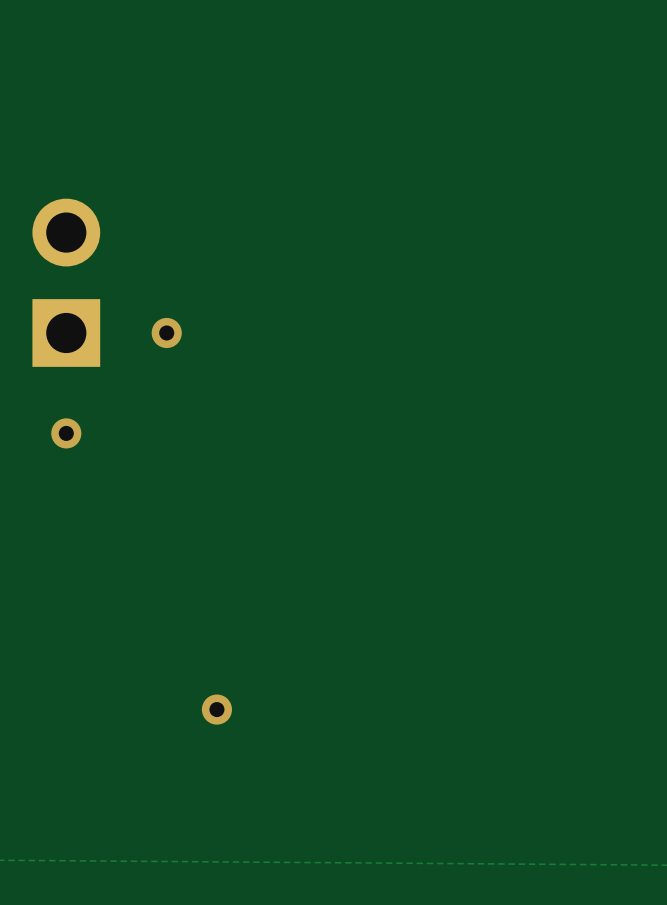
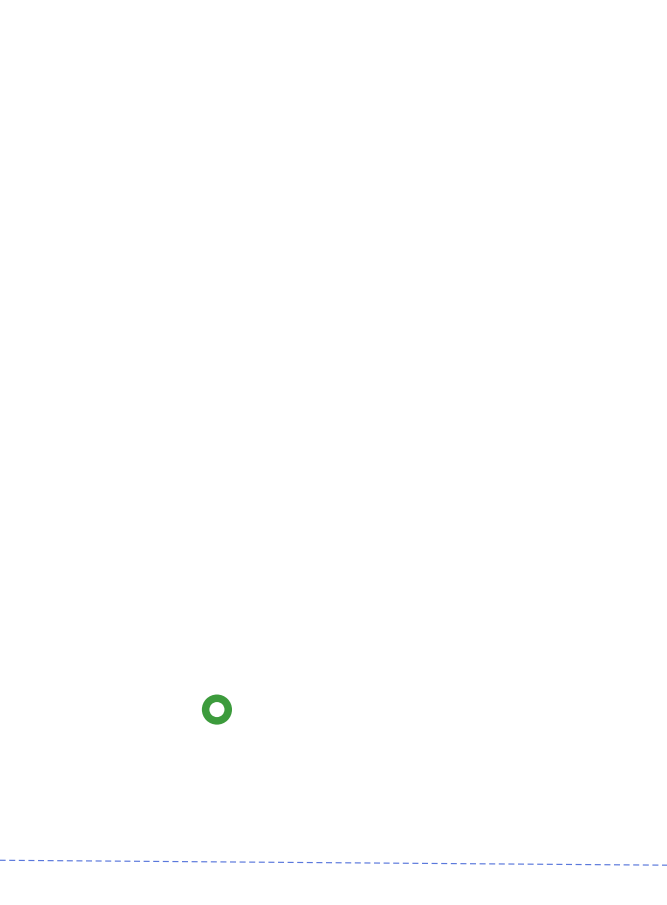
part: (66, 282) -> none
via: (166, 332) -> none
via: (66, 433) -> none

